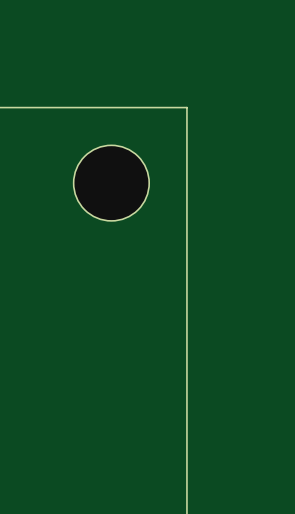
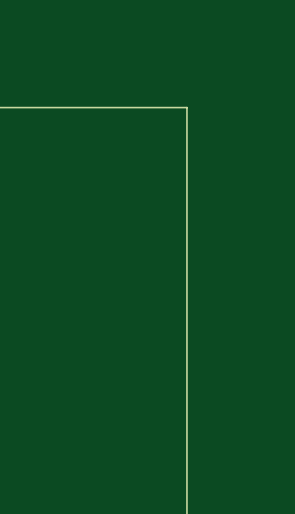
hole: (111, 183) -> none

